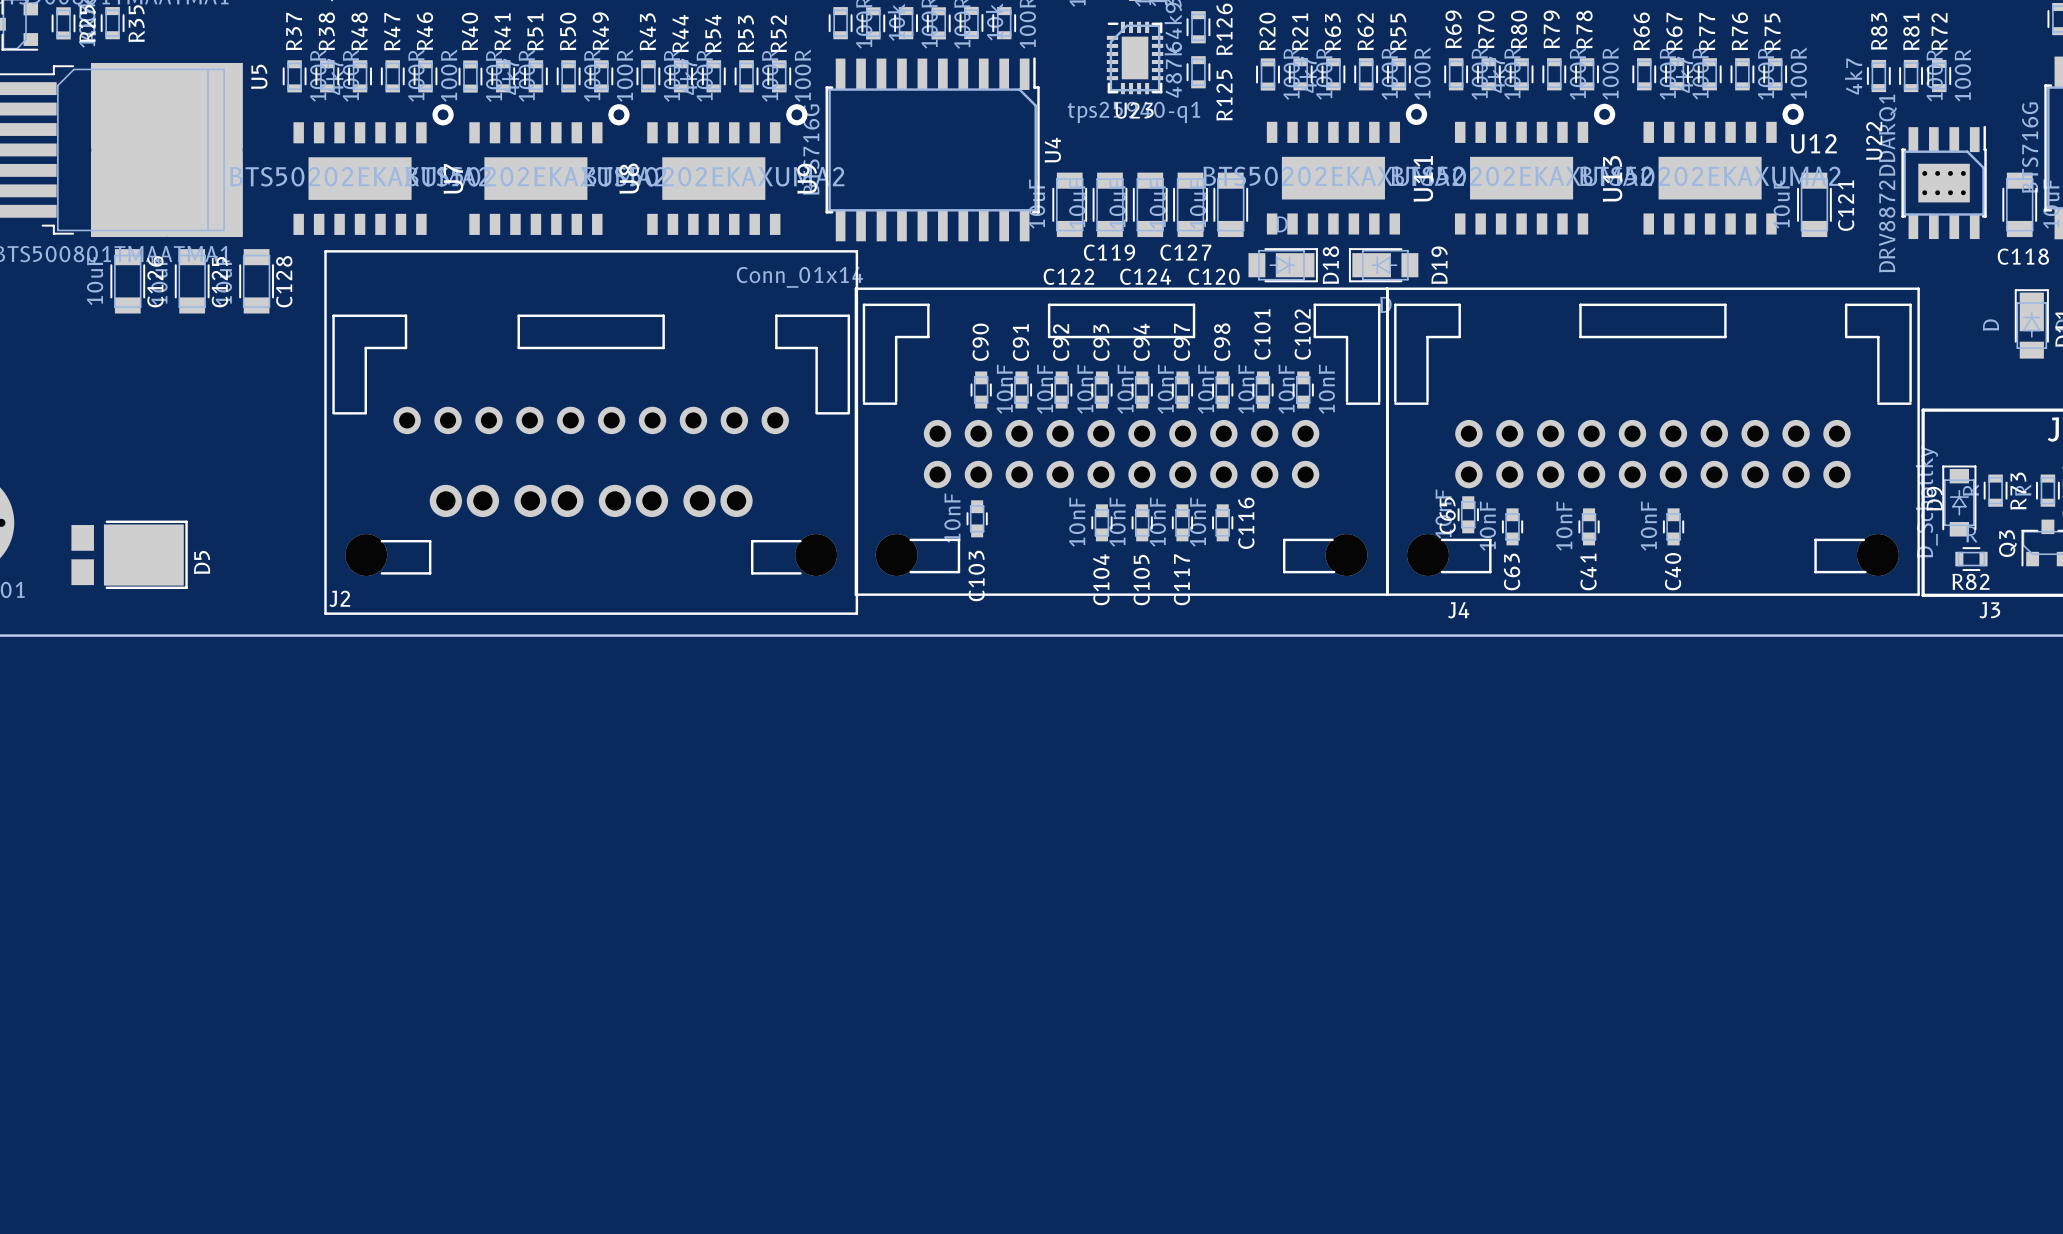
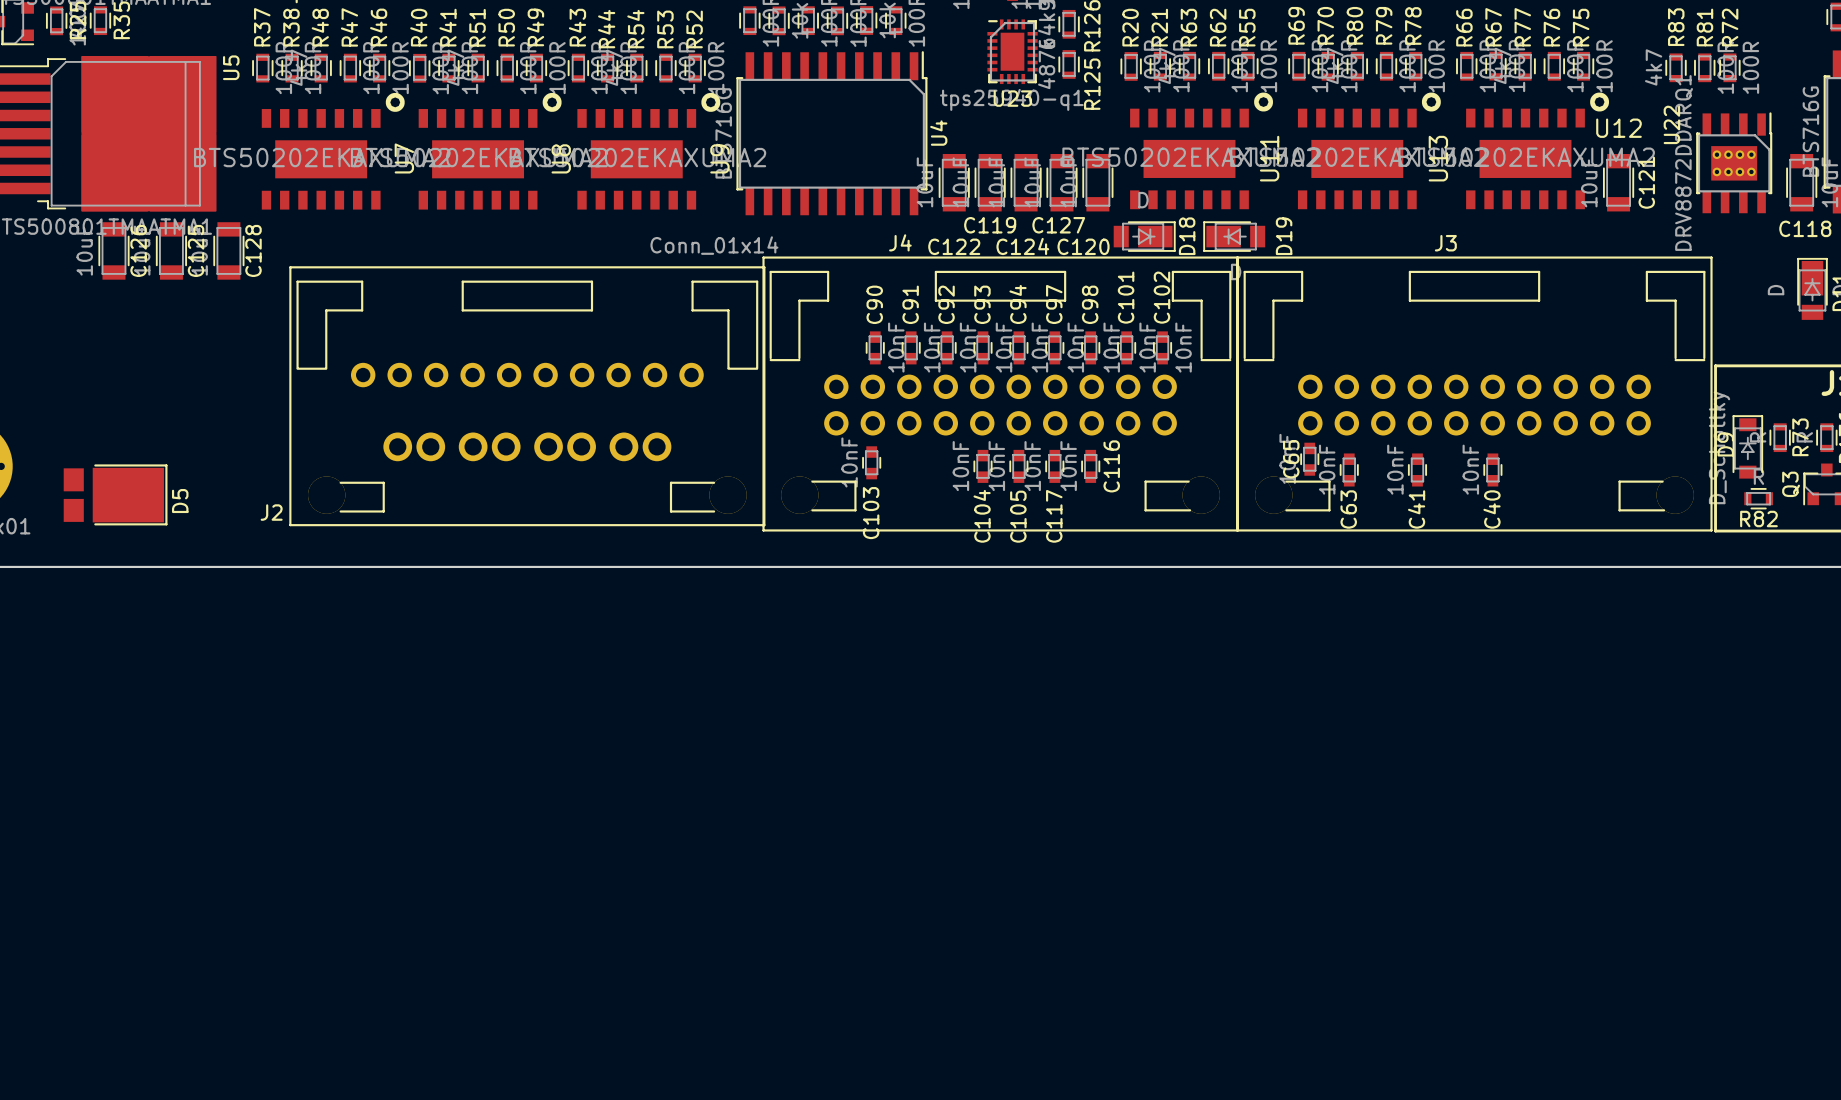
J2 footprint: [324, 250, 859, 615] -> [289, 266, 766, 527]
J2 name position: J2 (339, 598) -> J2 (271, 512)
J4 name position: J4 (1458, 610) -> J4 (900, 242)
J3 name position: J3 (1989, 610) -> J3 (1445, 243)

